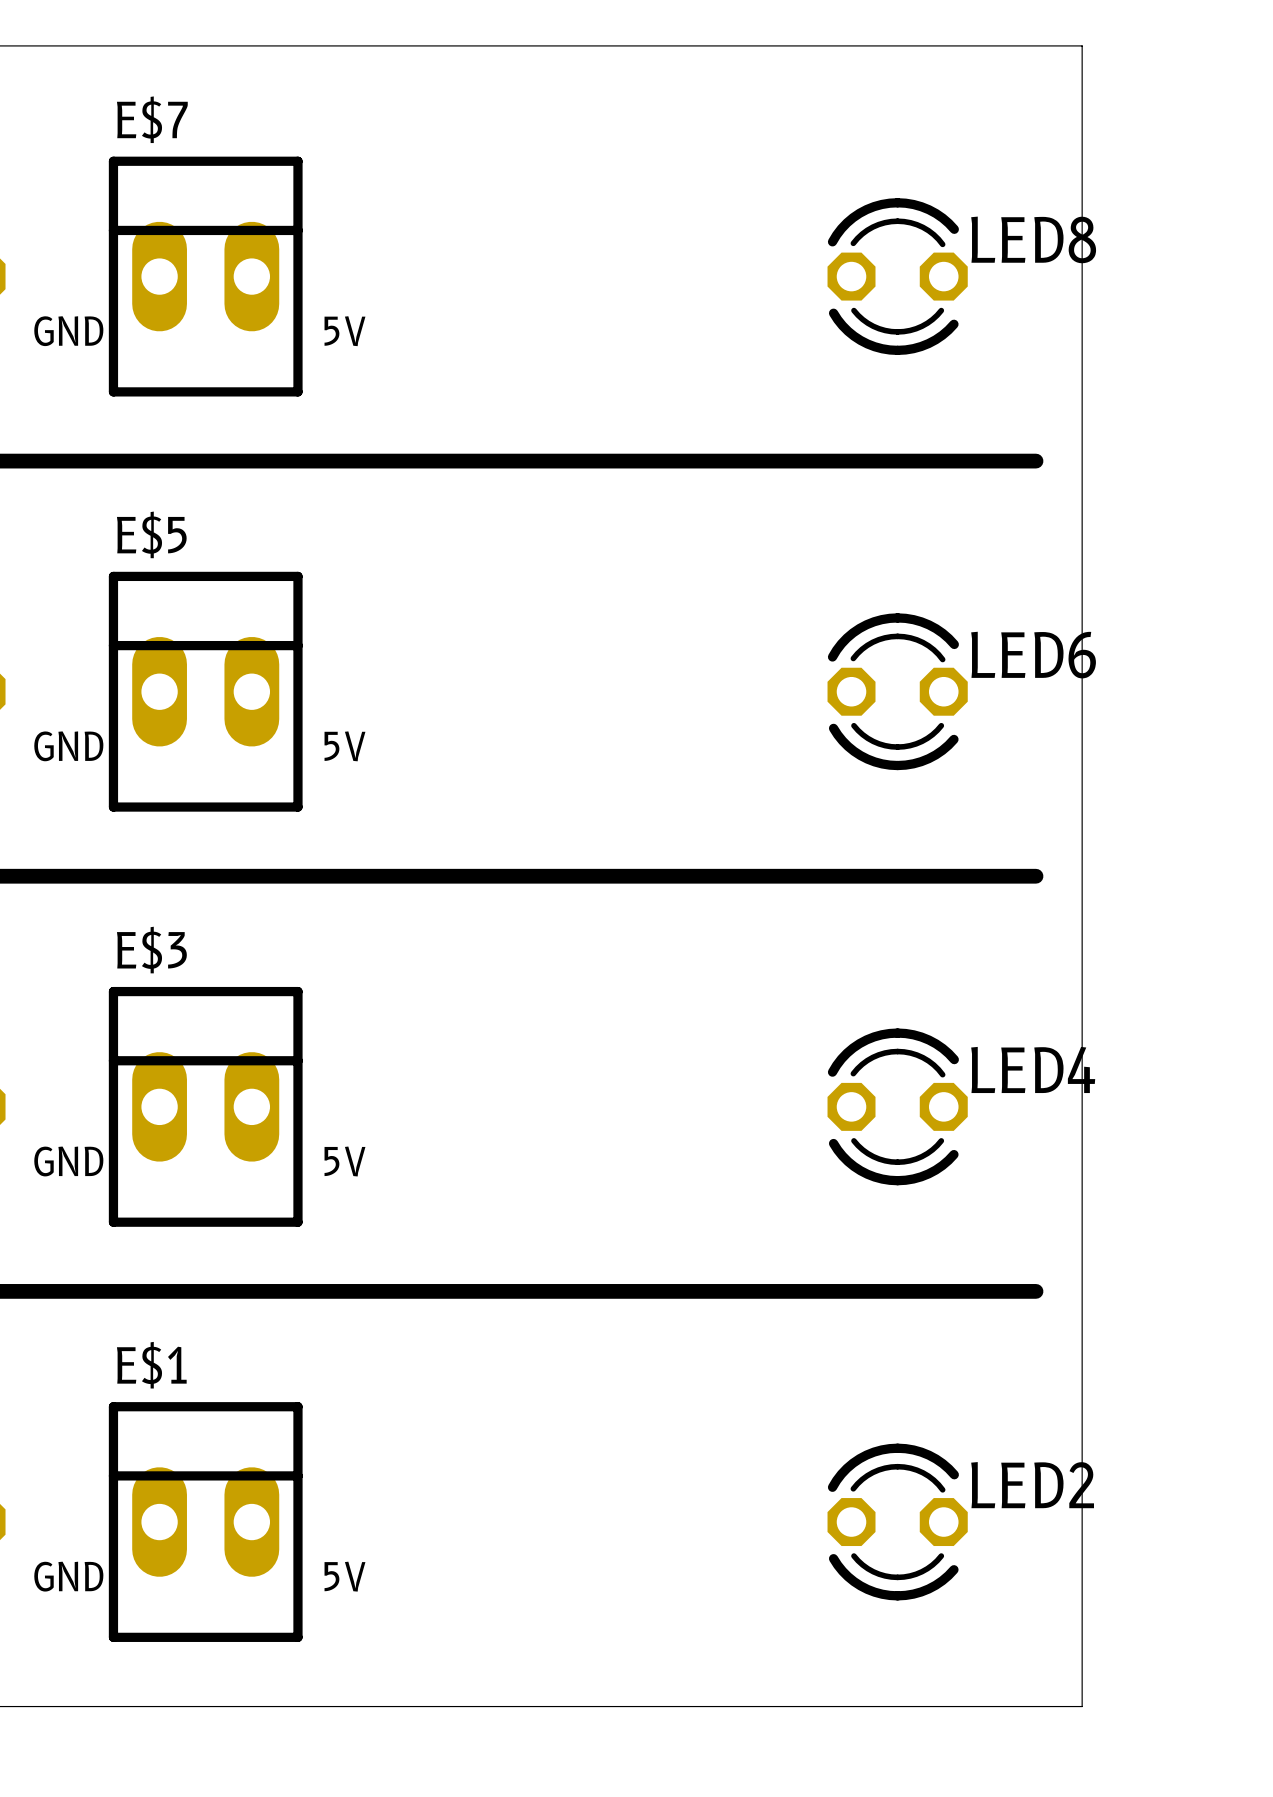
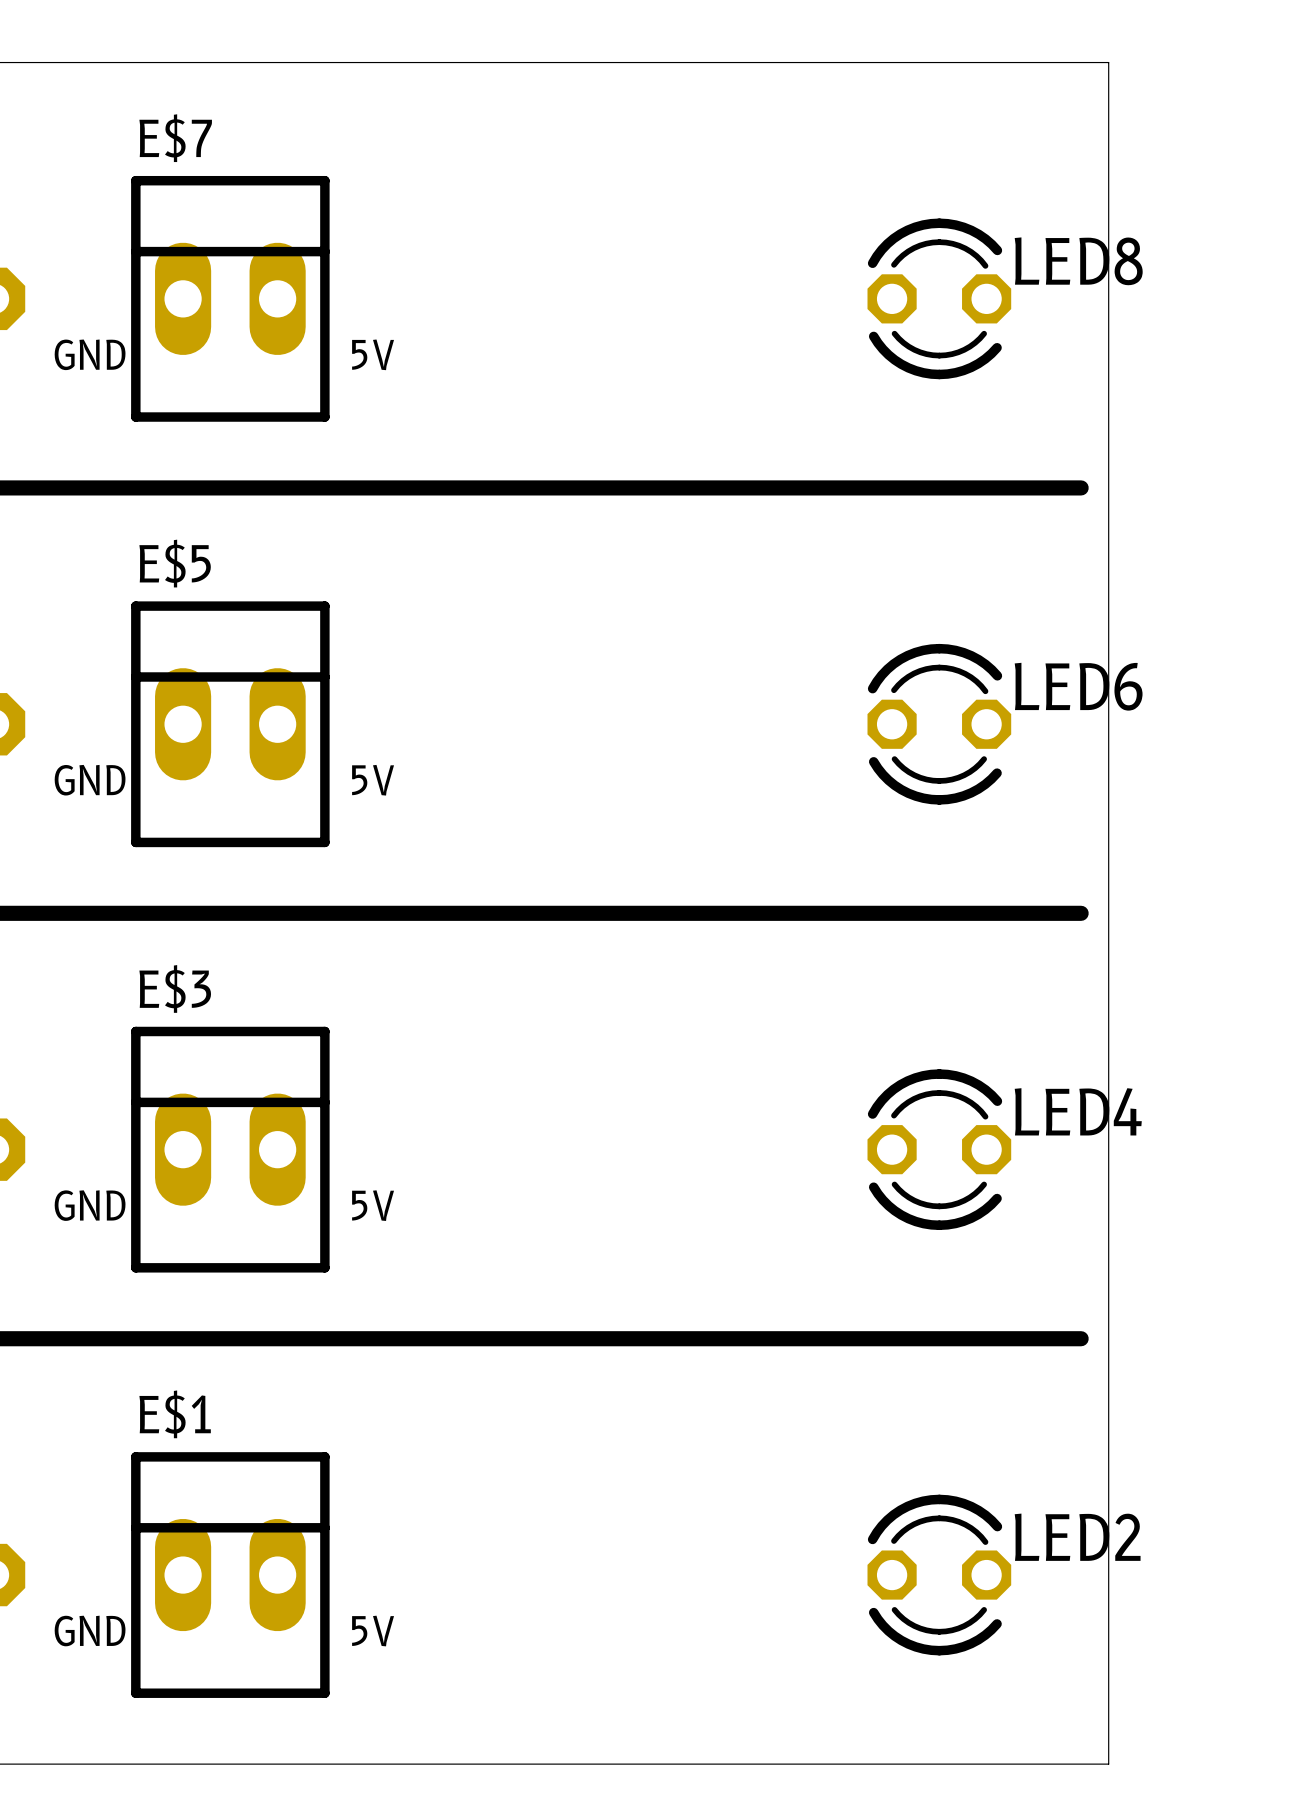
board edge: (1062, 45) (1082, 45) (1082, 1706) (1062, 1706) -> (1108, 62) (1108, 1764)

